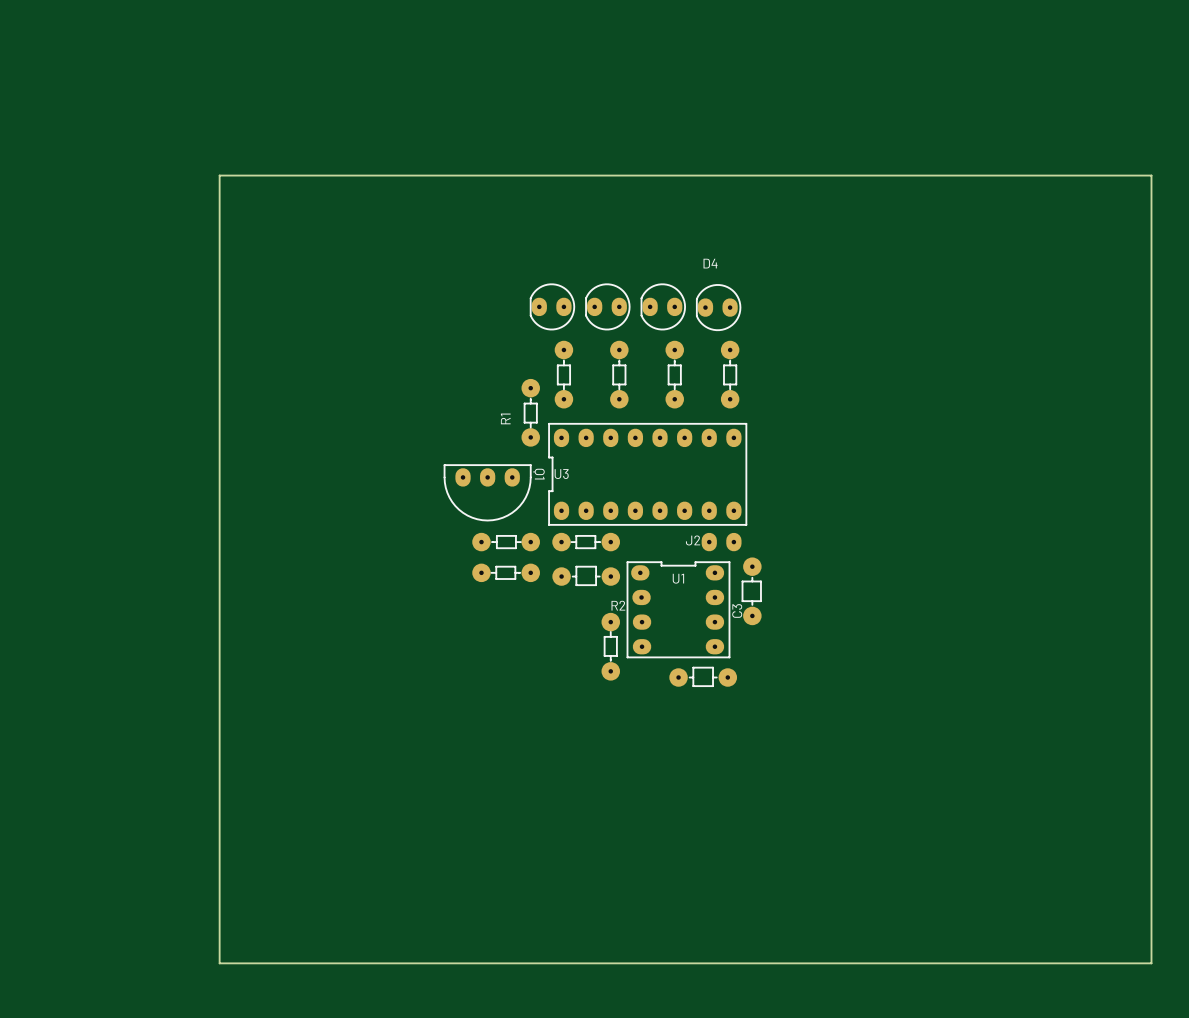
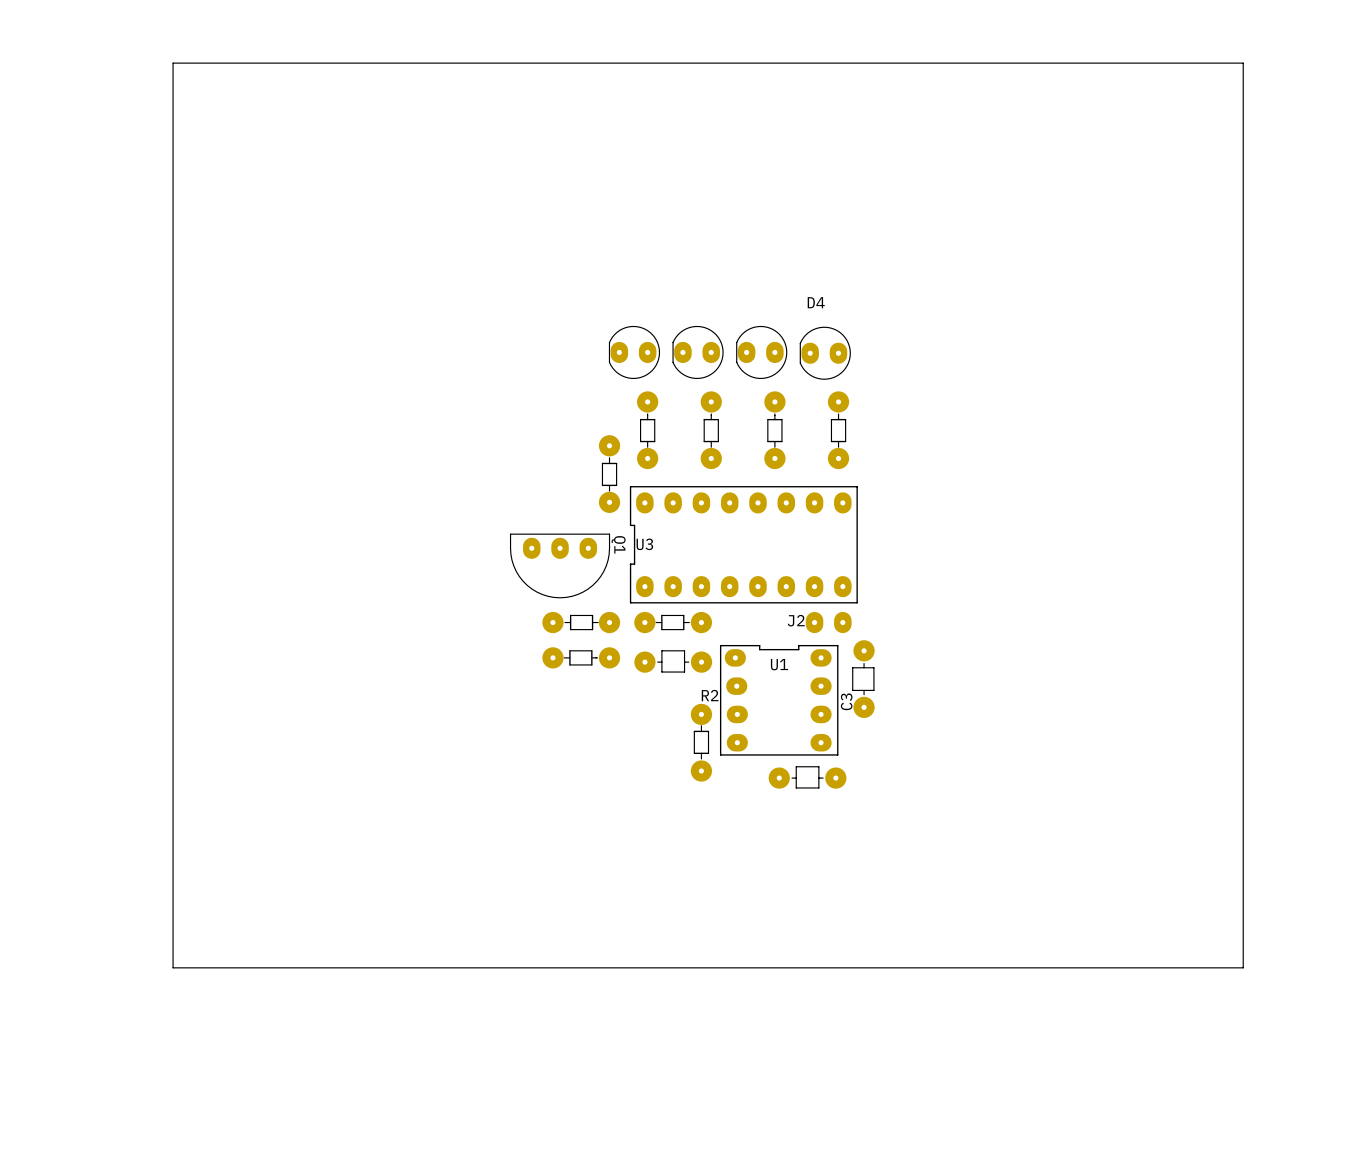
board edge: (219, 175) (1151, 175) (1151, 963) (219, 963) (219, 175) -> (173, 63) (173, 967) (1243, 967) (1243, 63) (173, 63)
R1 name: R1 (505, 418) -> none

